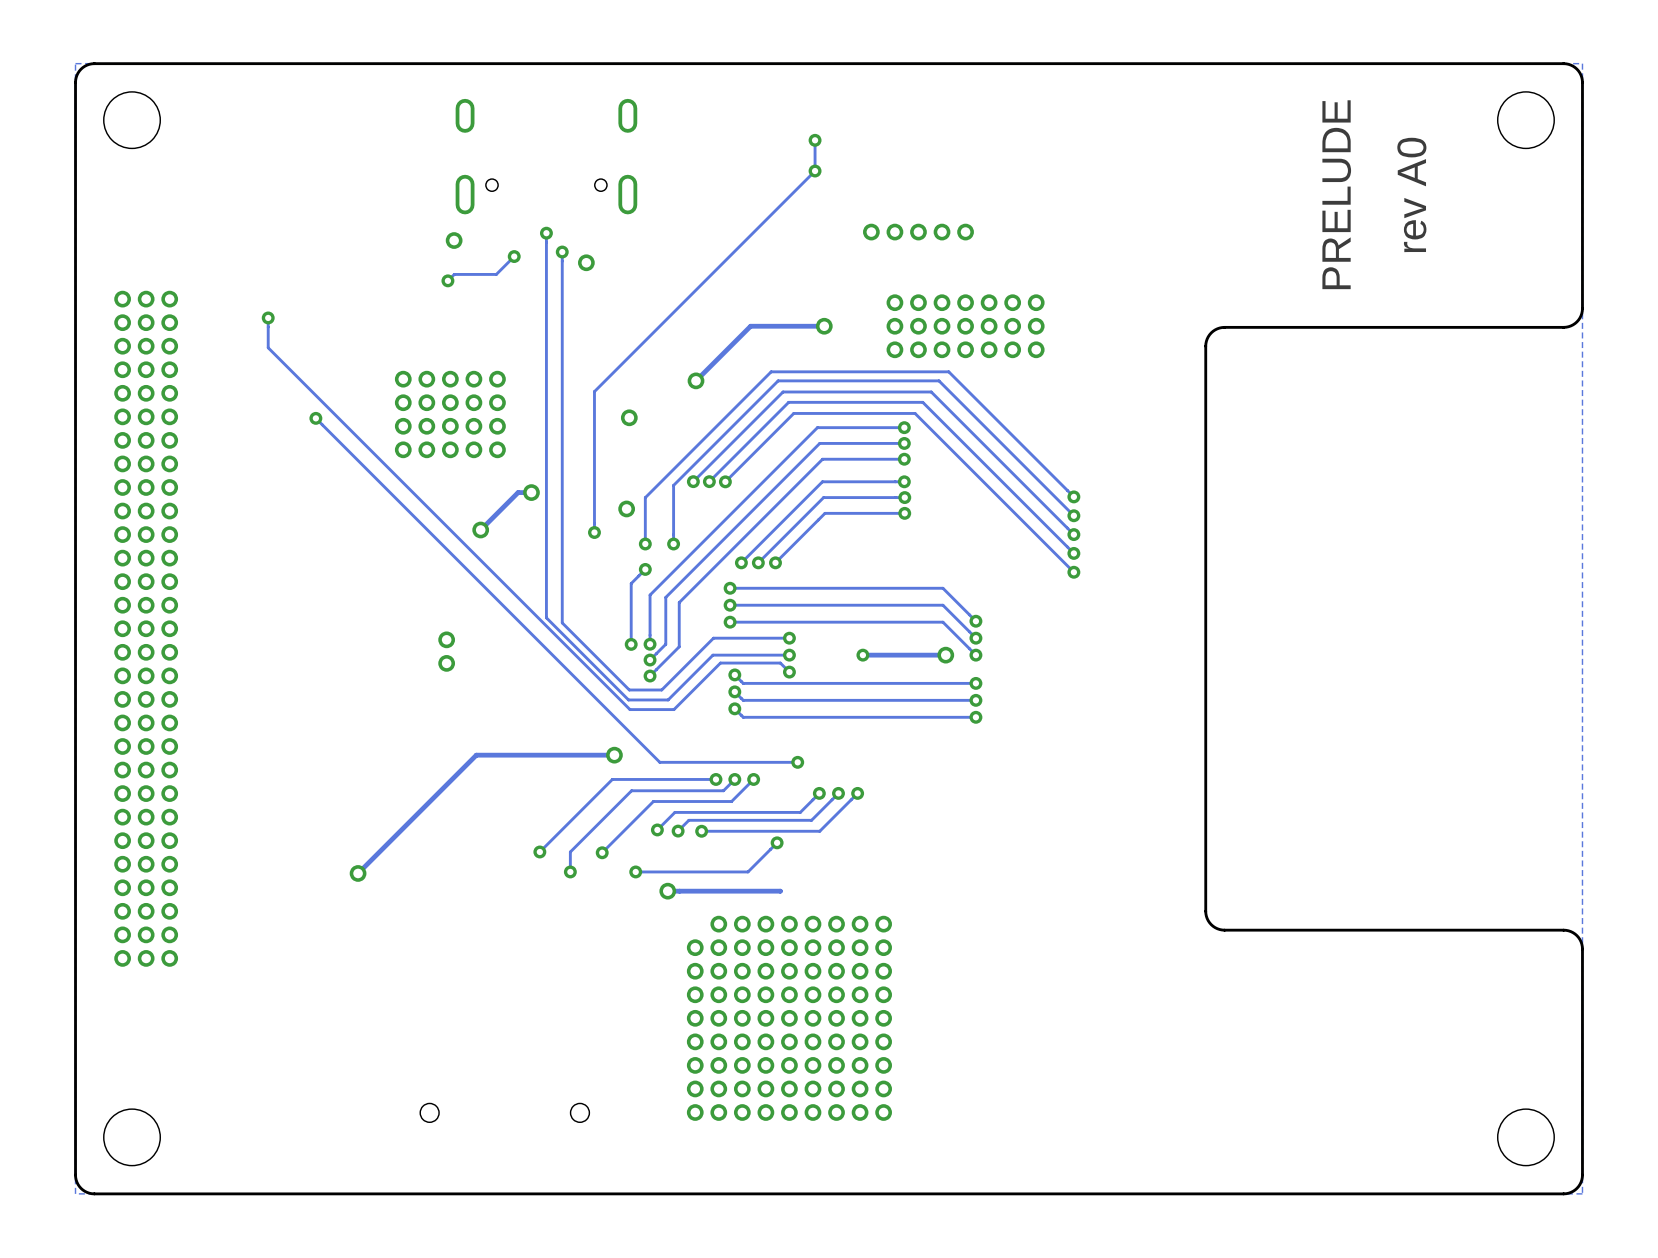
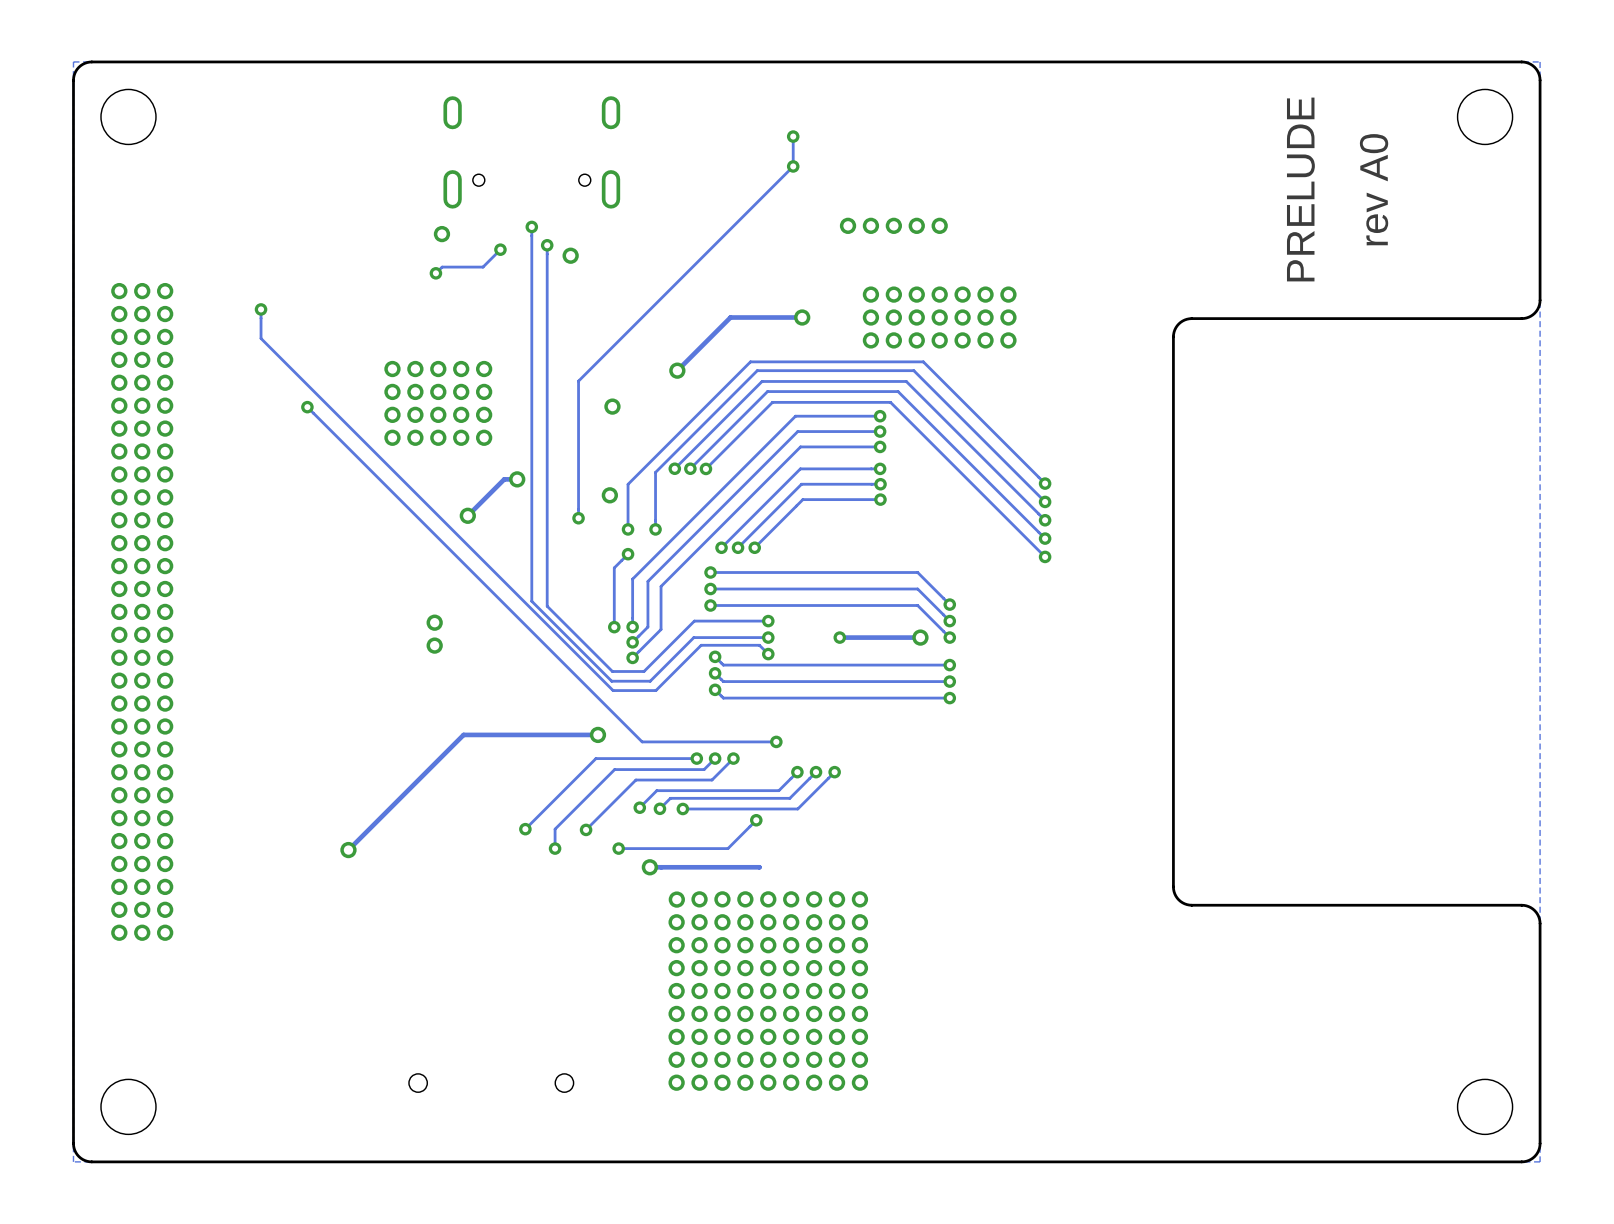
via: none -> (676, 899)

